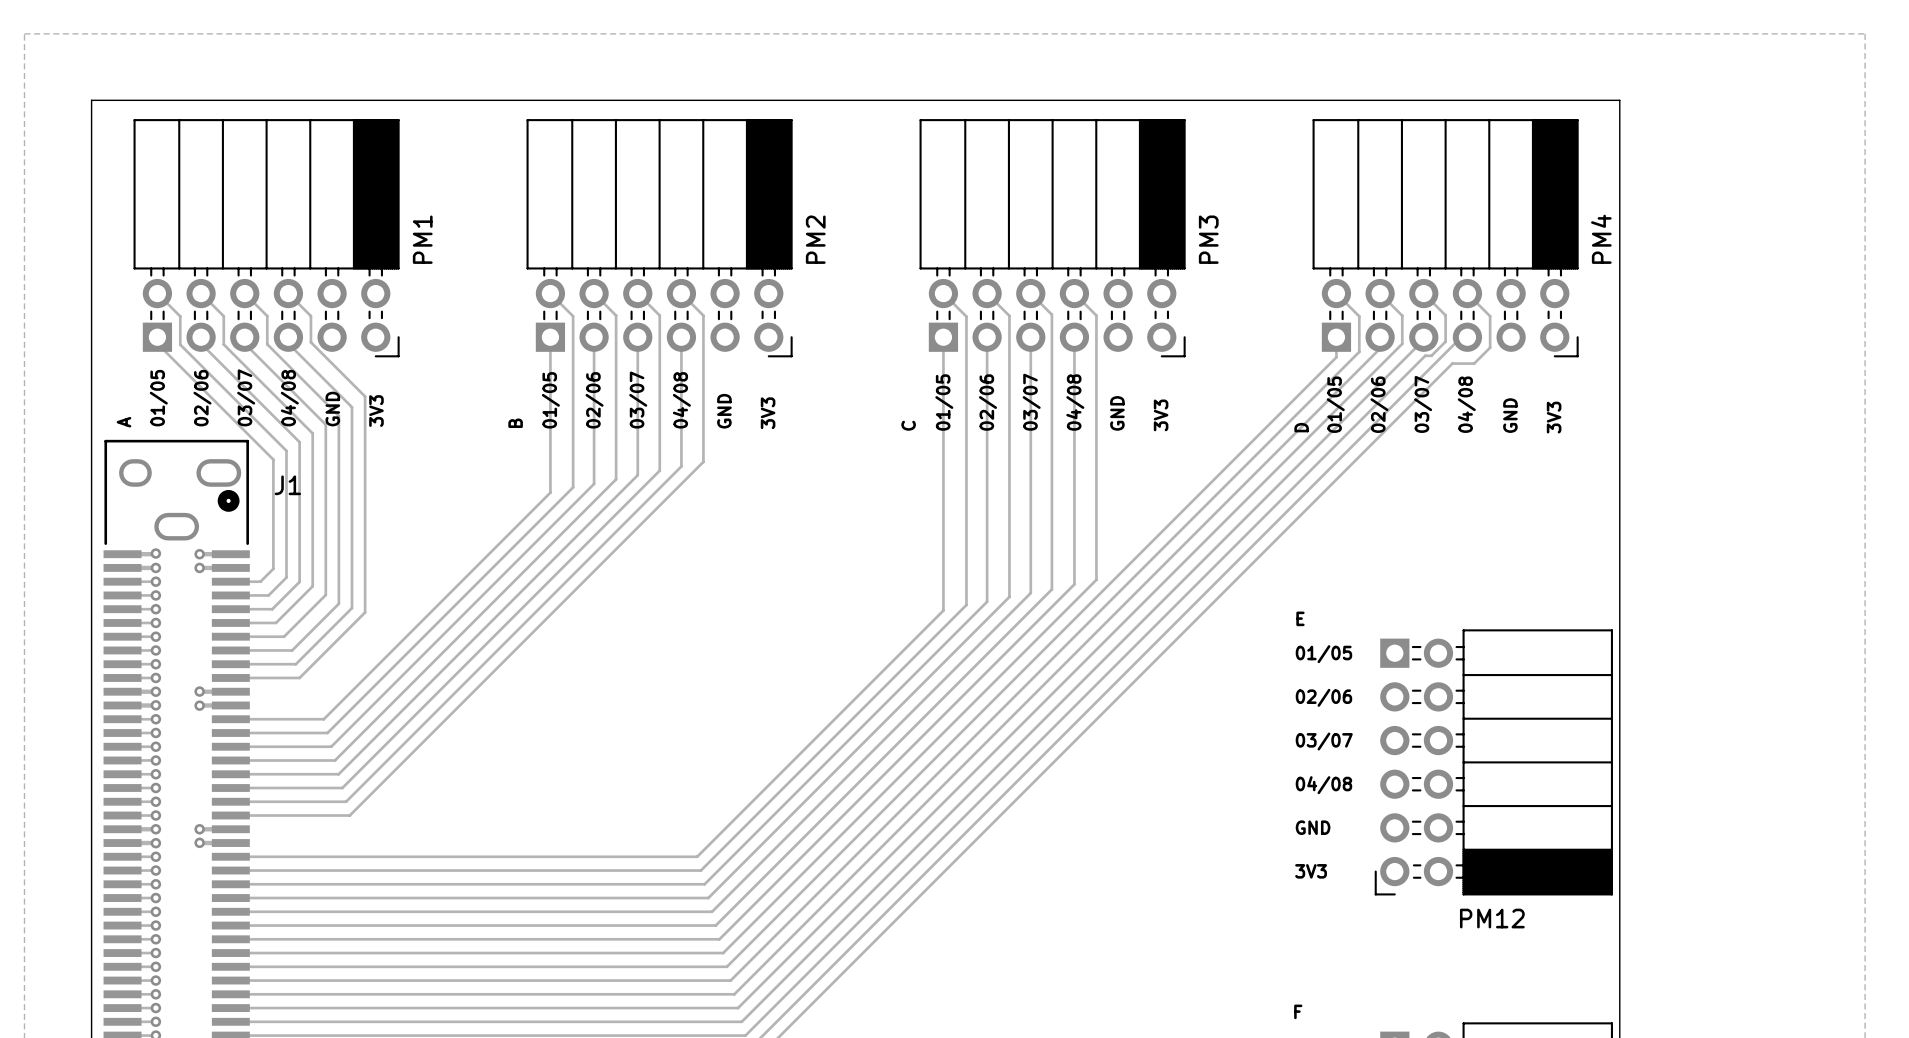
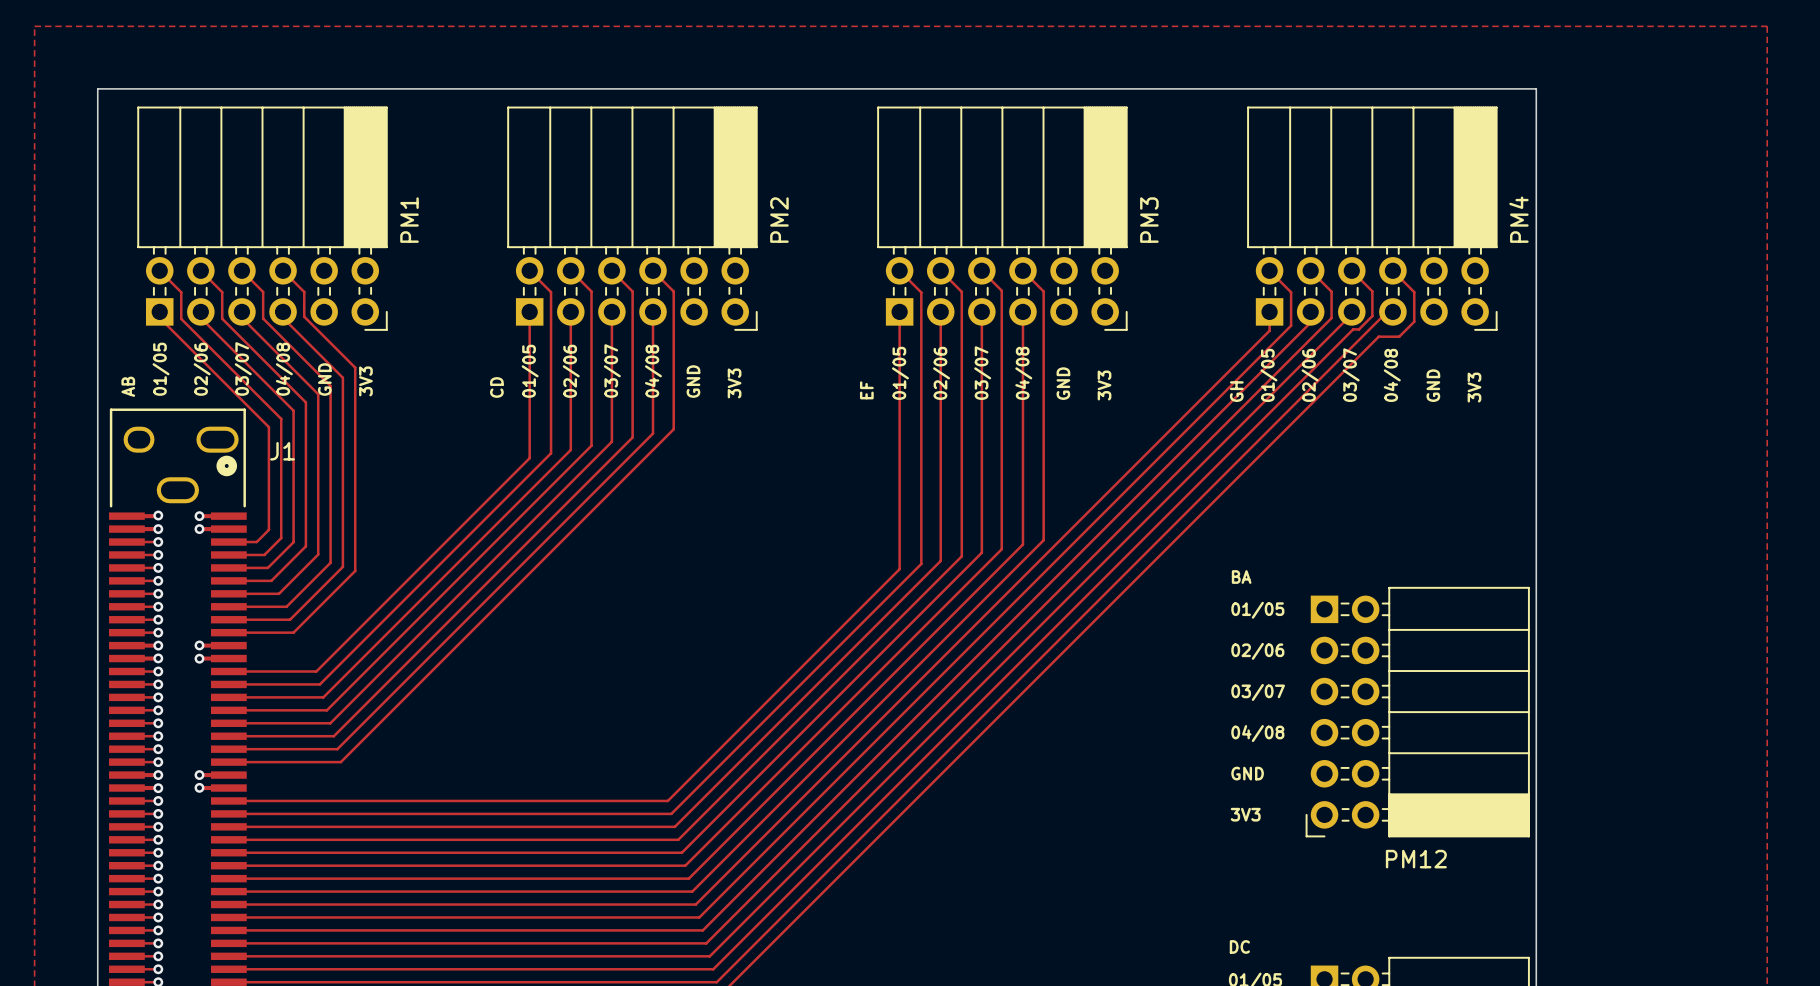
text: A (123, 422) -> AB (128, 386)
text: B (515, 423) -> CD (496, 387)
text: C (908, 425) -> EF (866, 390)
text: D (1301, 427) -> GH (1236, 391)
text: E (1300, 618) -> BA (1241, 577)
text: F (1298, 1011) -> DC (1239, 946)

